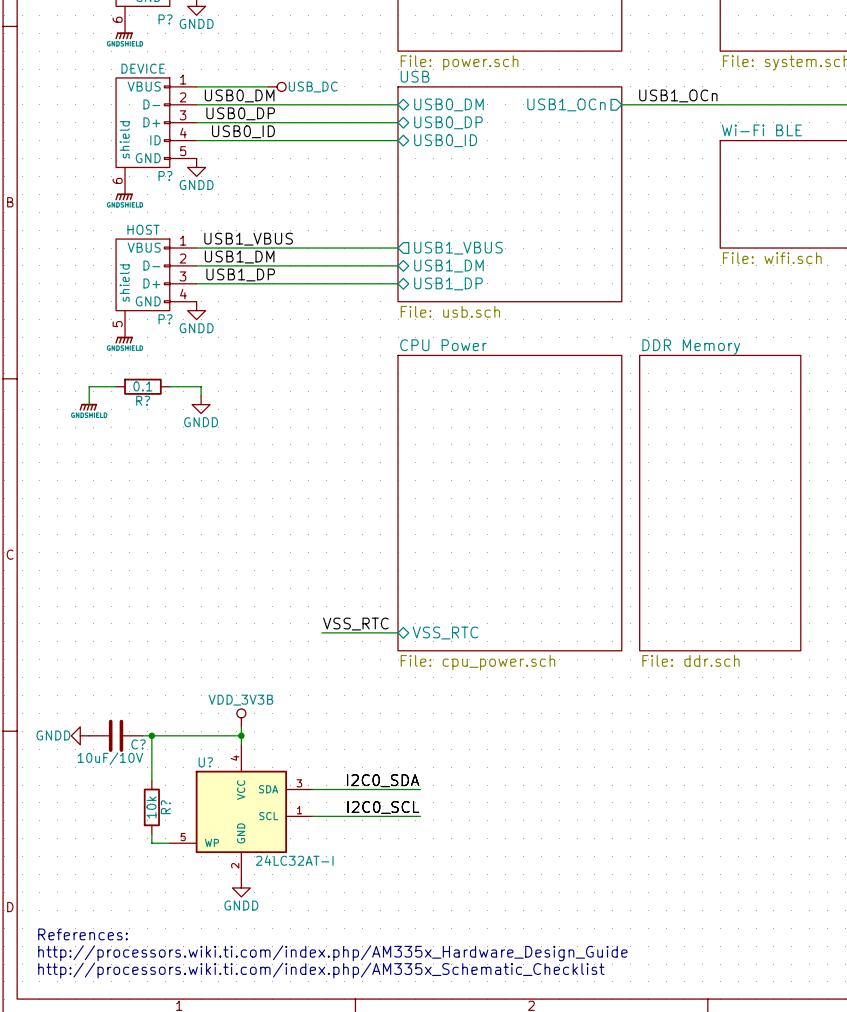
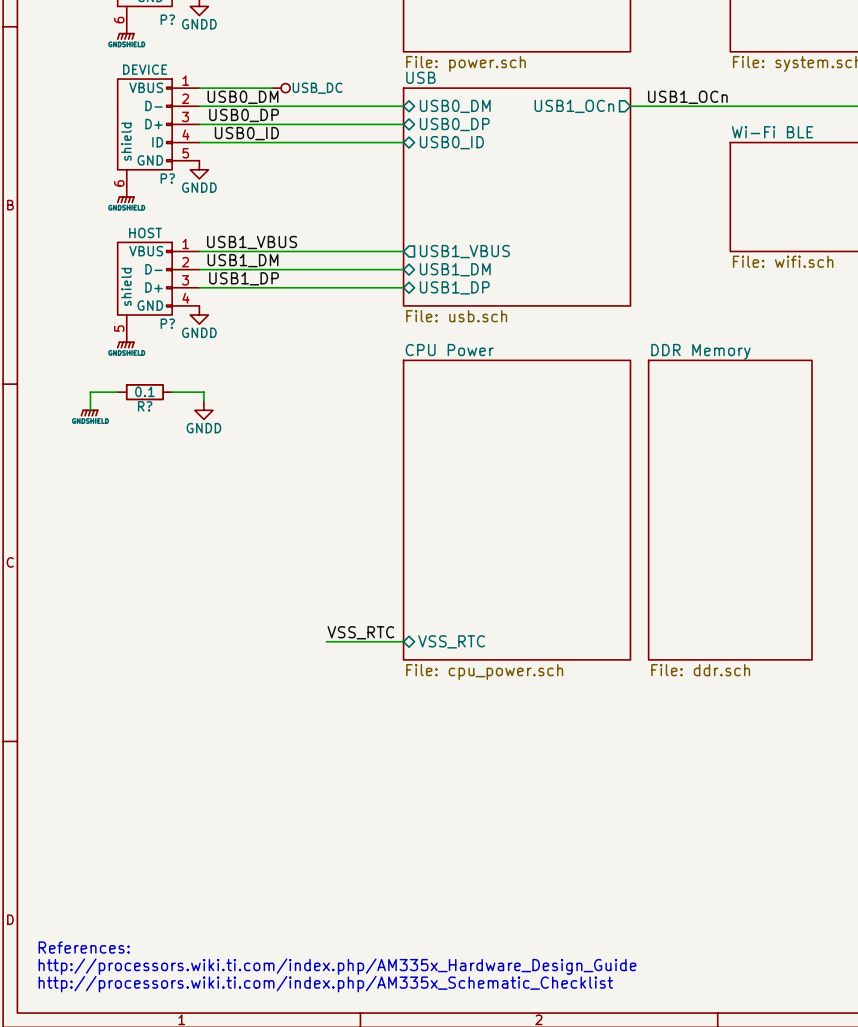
power symbol: VDD_3V3B (241, 717) -> none
wire: (241, 726) (241, 744) -> none
power symbol: GNDD (80, 735) -> none
C?: 10uF/10V (116, 735) -> none
wire: (142, 735) (241, 735) -> none
wire: (151, 735) (151, 780) -> none
junction: (151, 735) -> none
junction: (241, 735) -> none
label: I2C0_SDA (383, 780) -> none
wire: (312, 789) (420, 789) -> none
R?: 10k (151, 807) -> none
label: I2C0_SCL (383, 807) -> none
U?: 24LC32AT-I (241, 811) -> none
wire: (312, 816) (420, 816) -> none
wire: (151, 834) (151, 843) (169, 843) -> none
power symbol: GNDD (241, 887) -> none

